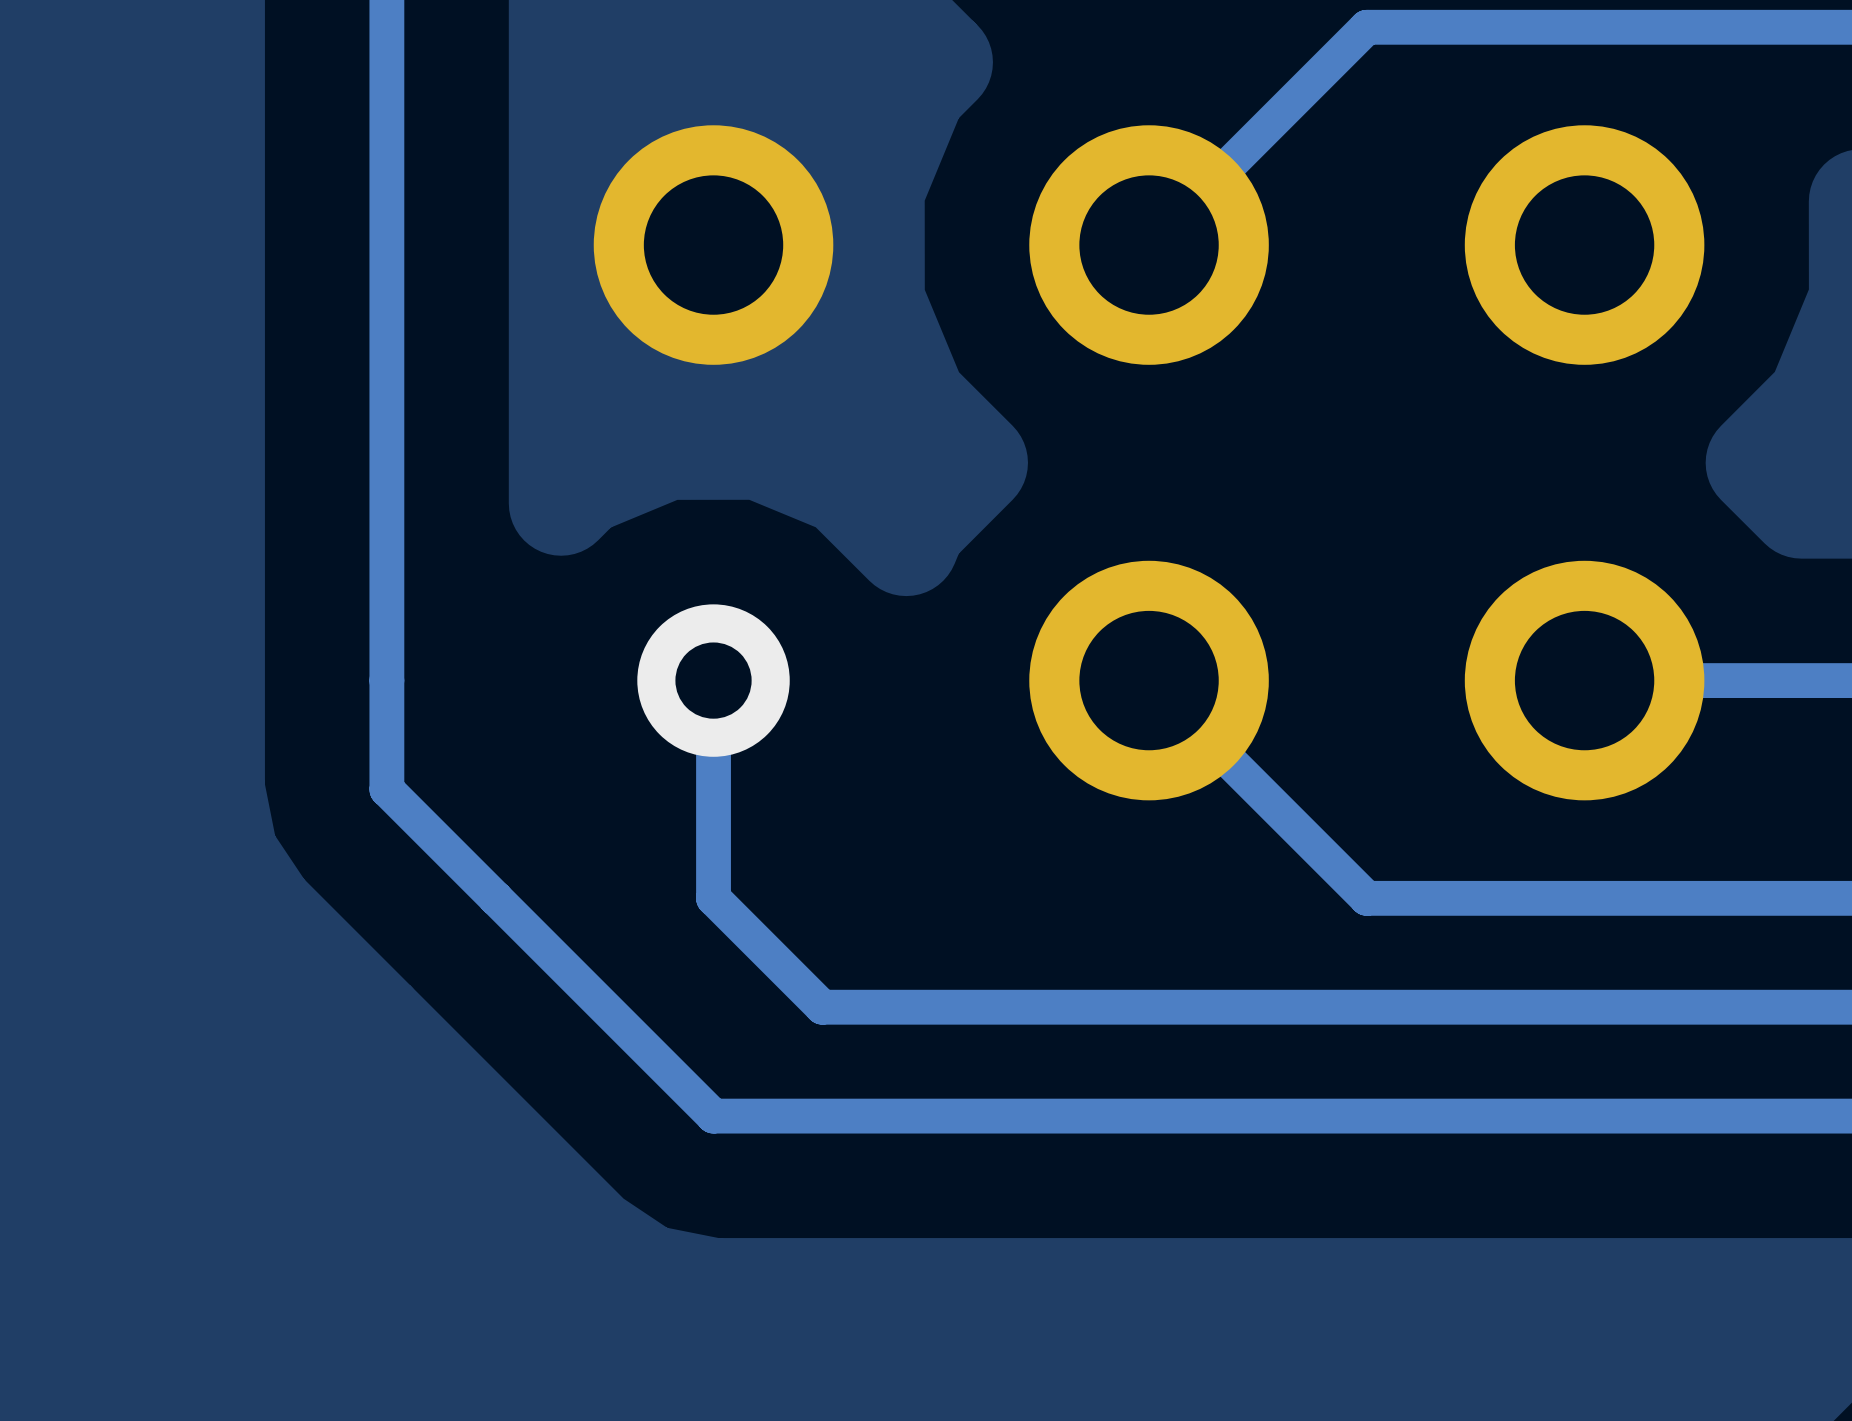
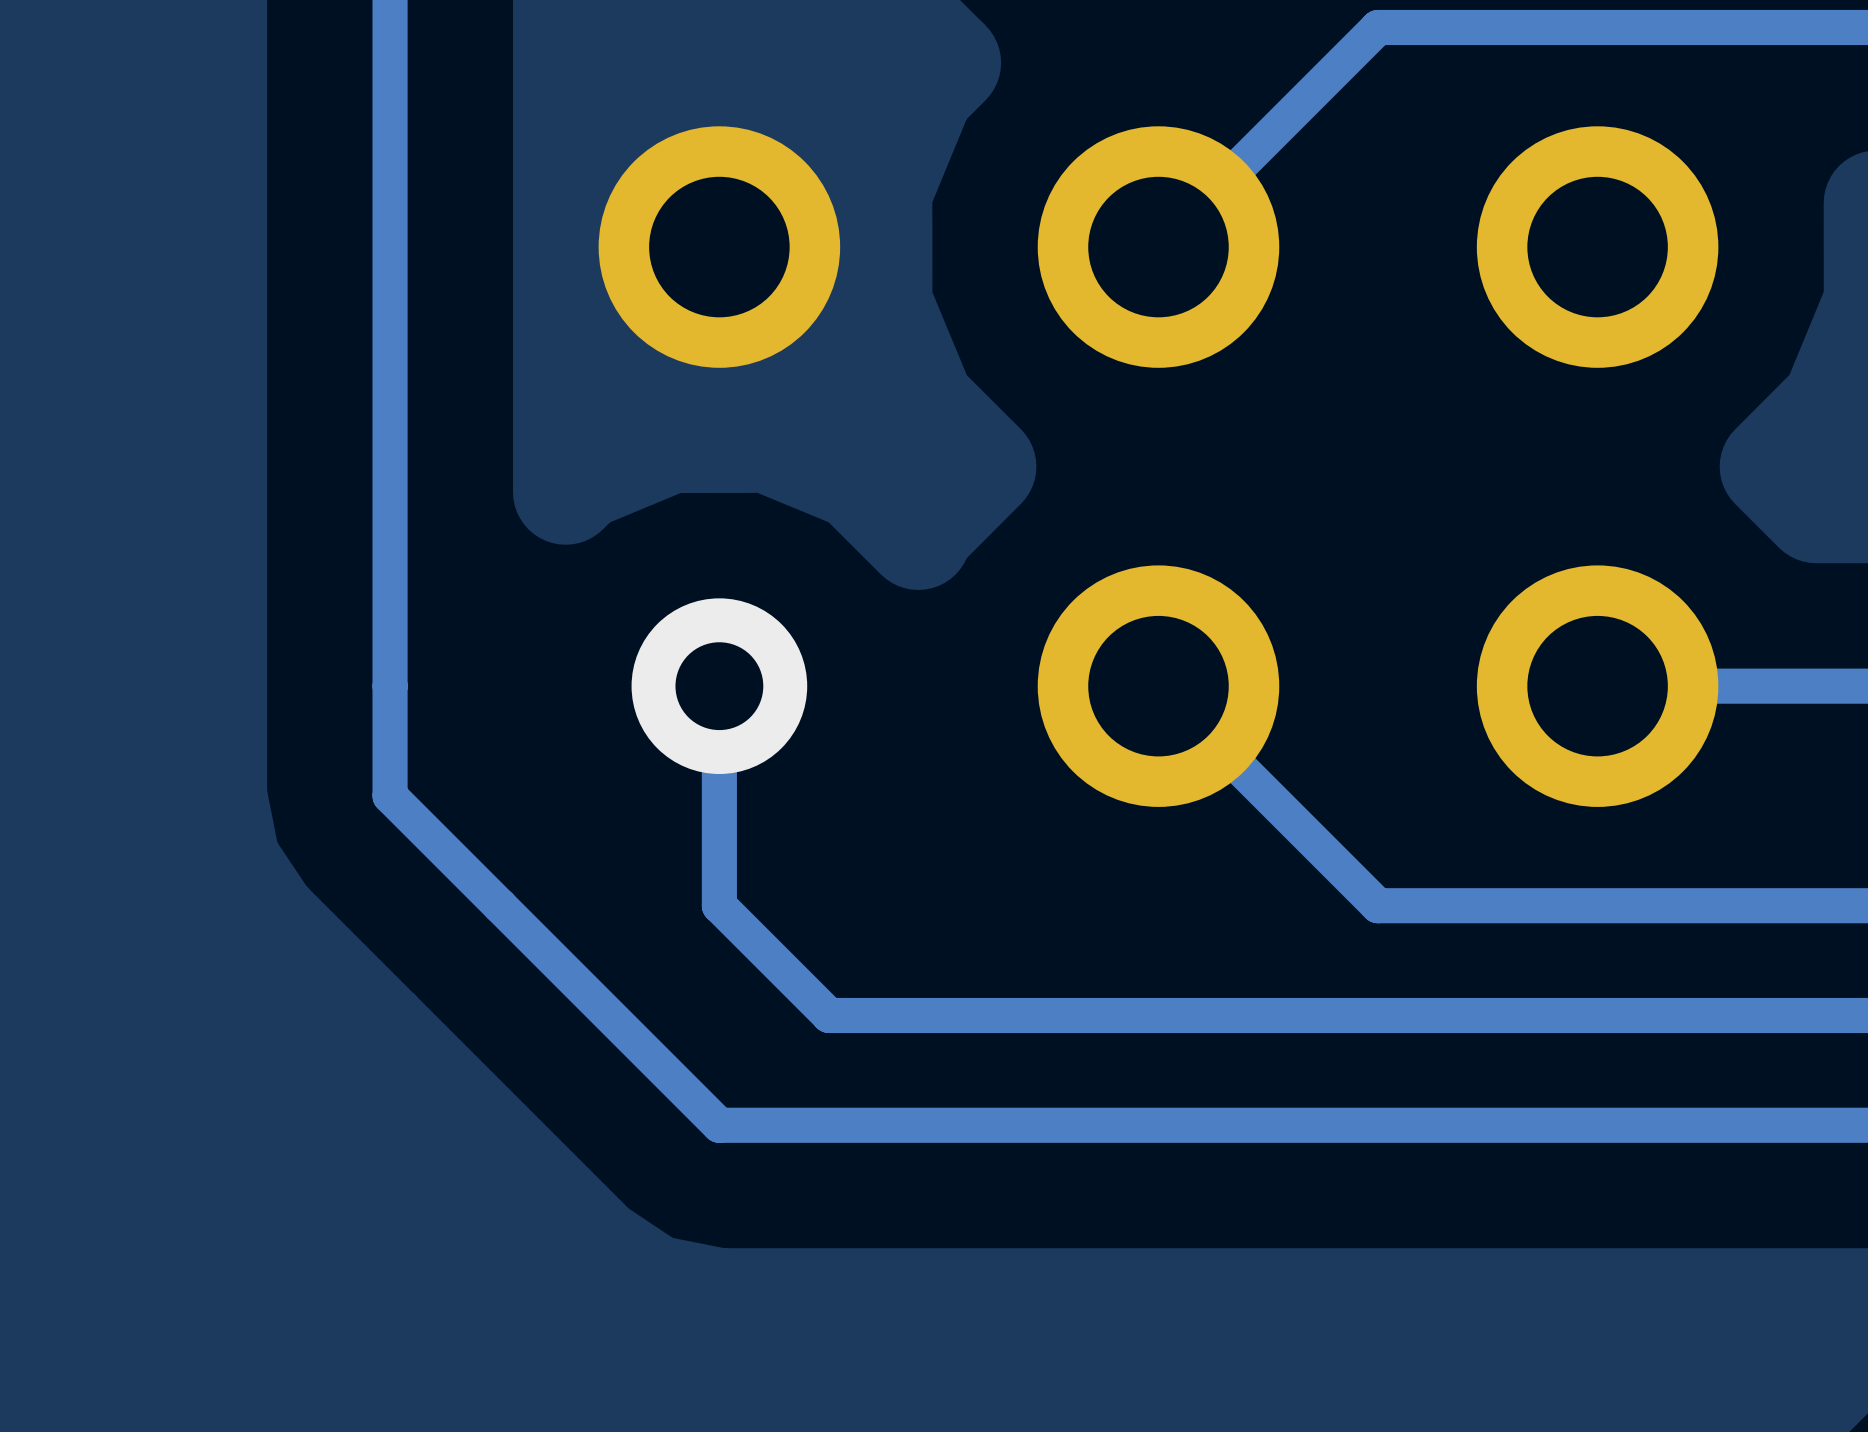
via size: [637, 604, 790, 757] -> [631, 598, 808, 774]

